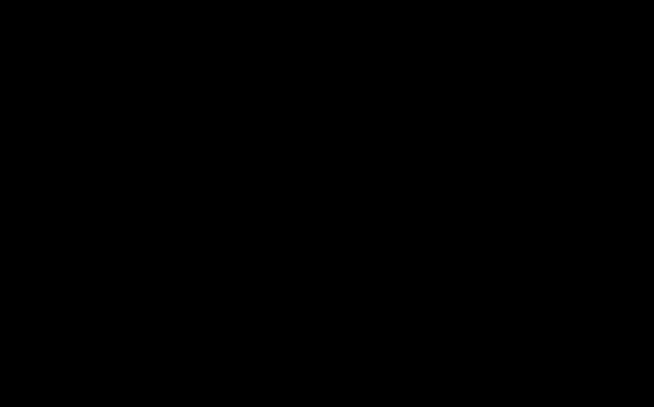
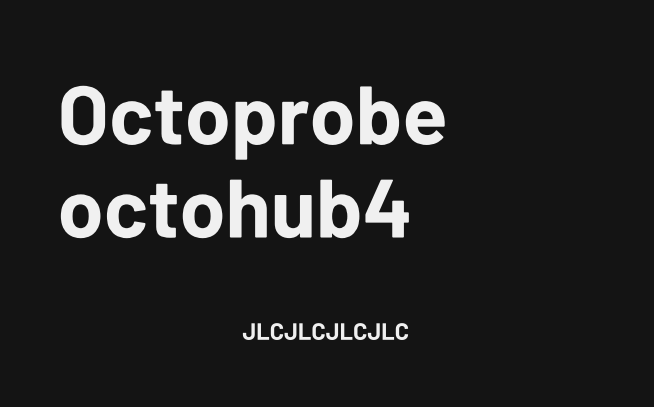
text: none -> Octoprobe (253, 122)
text: none -> octohub4 (234, 208)
text: none -> JLCJLCJLCJLC (325, 331)

